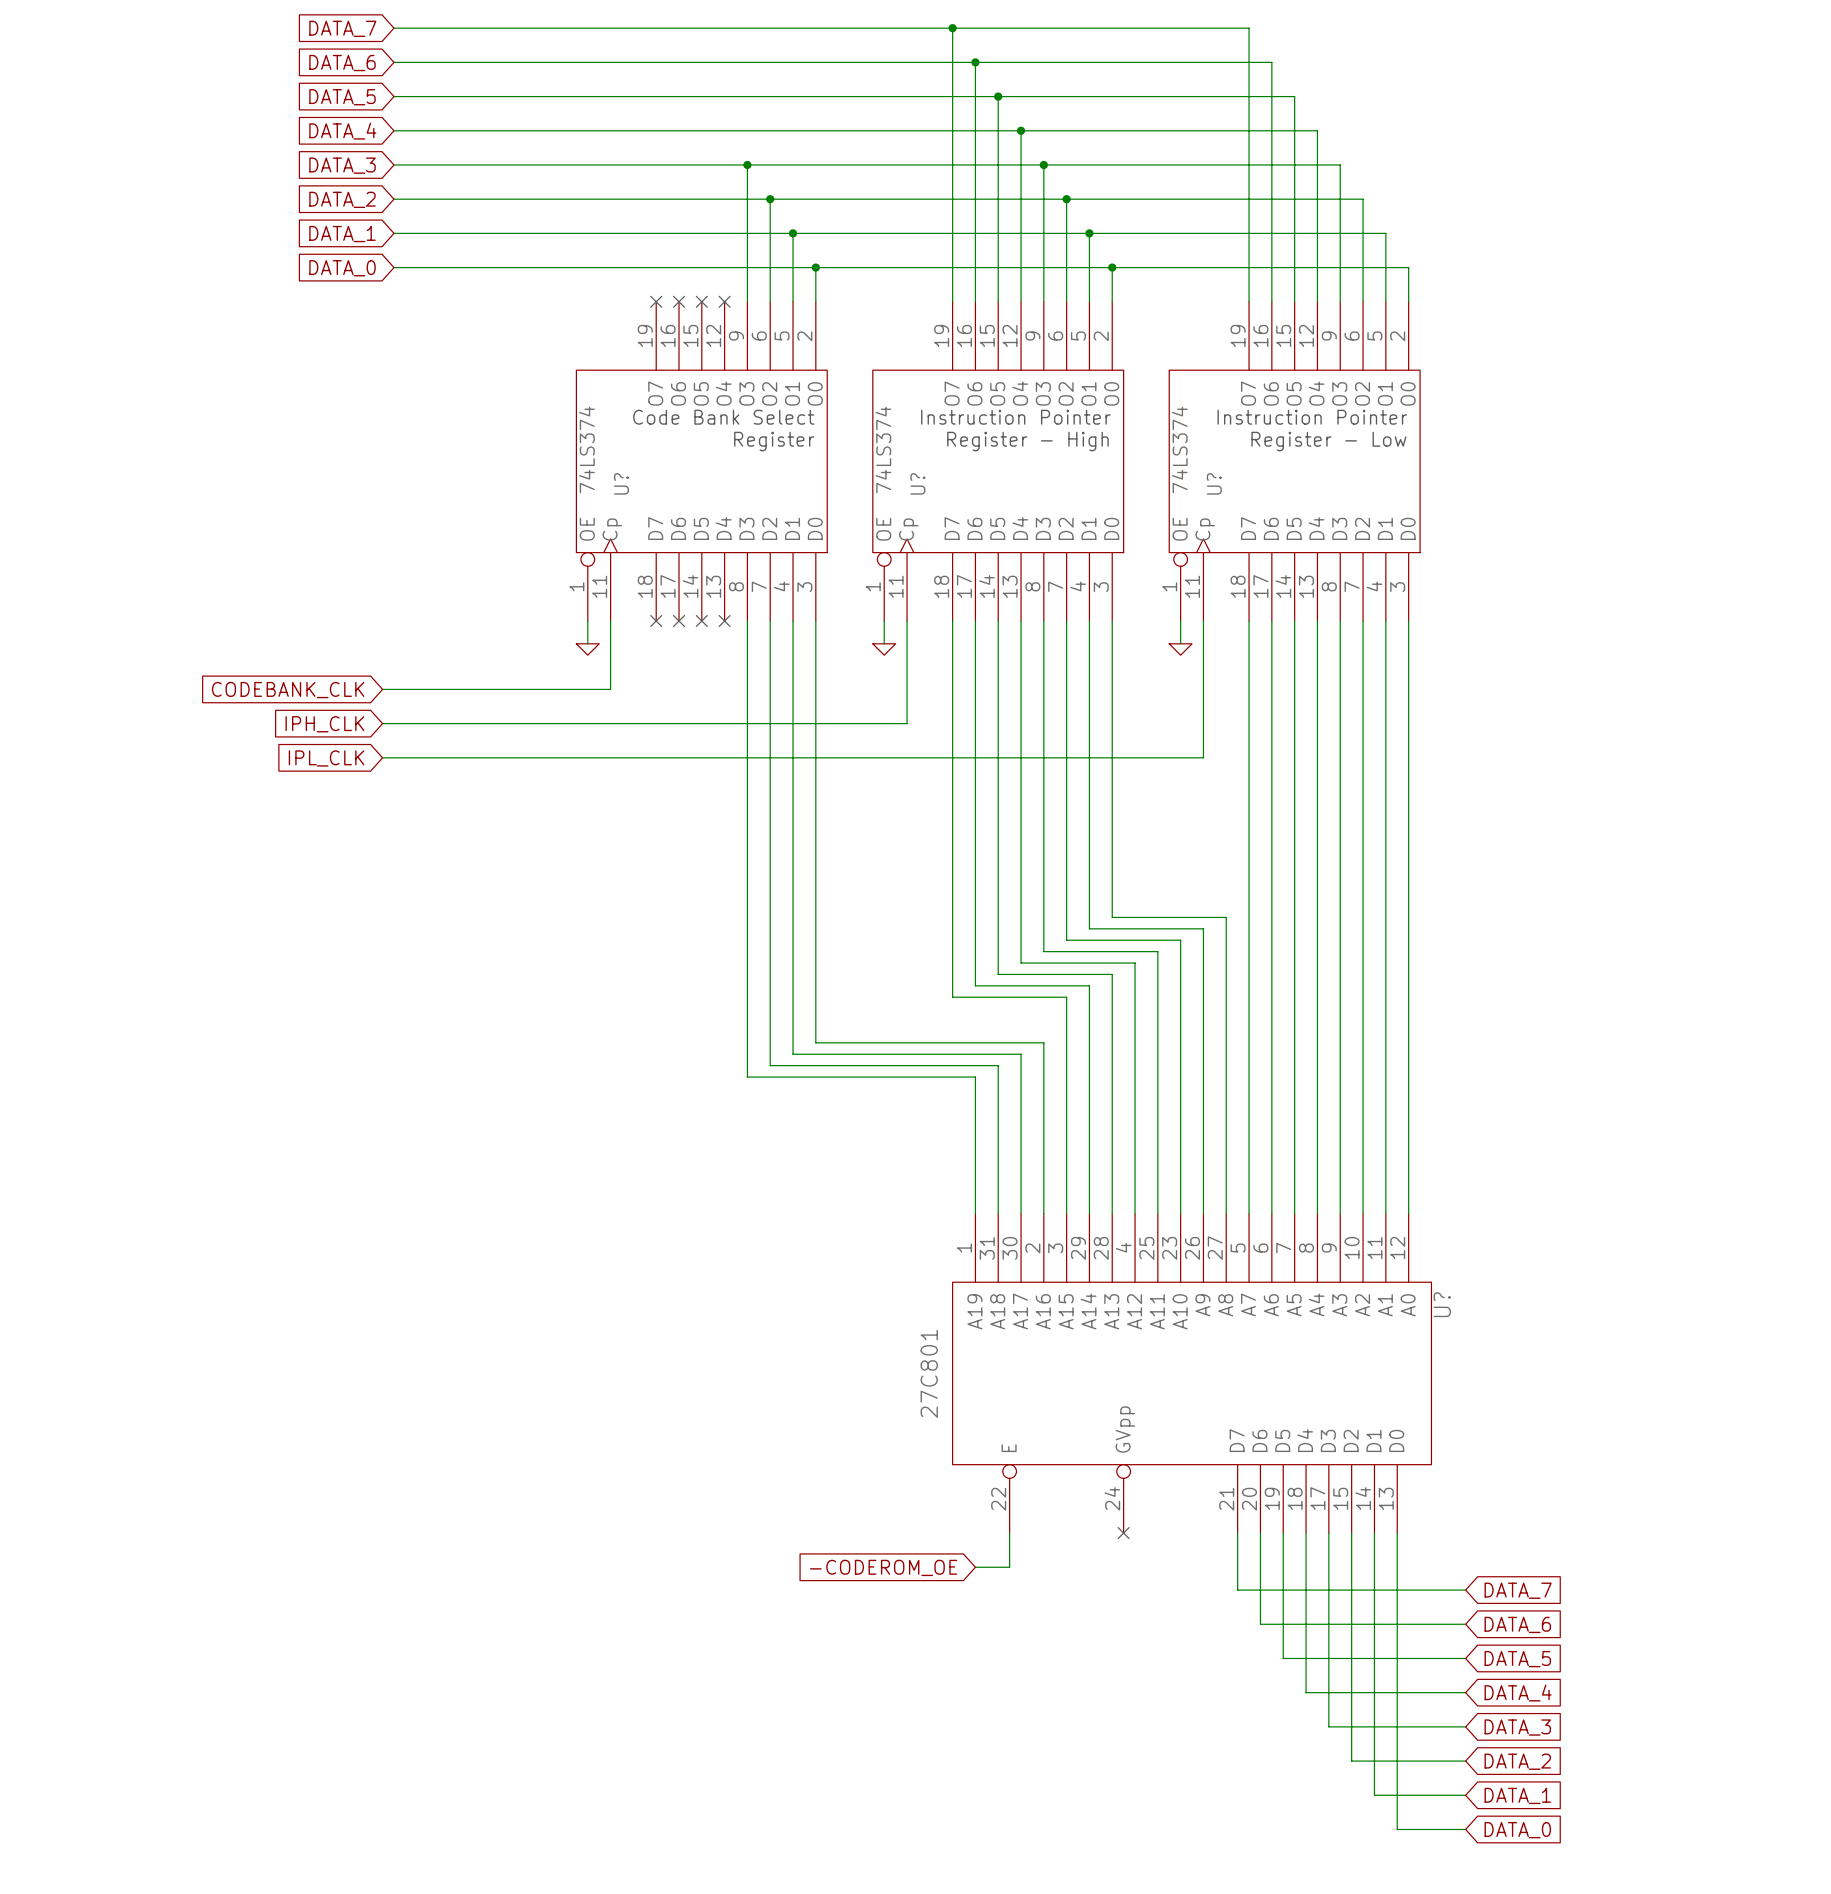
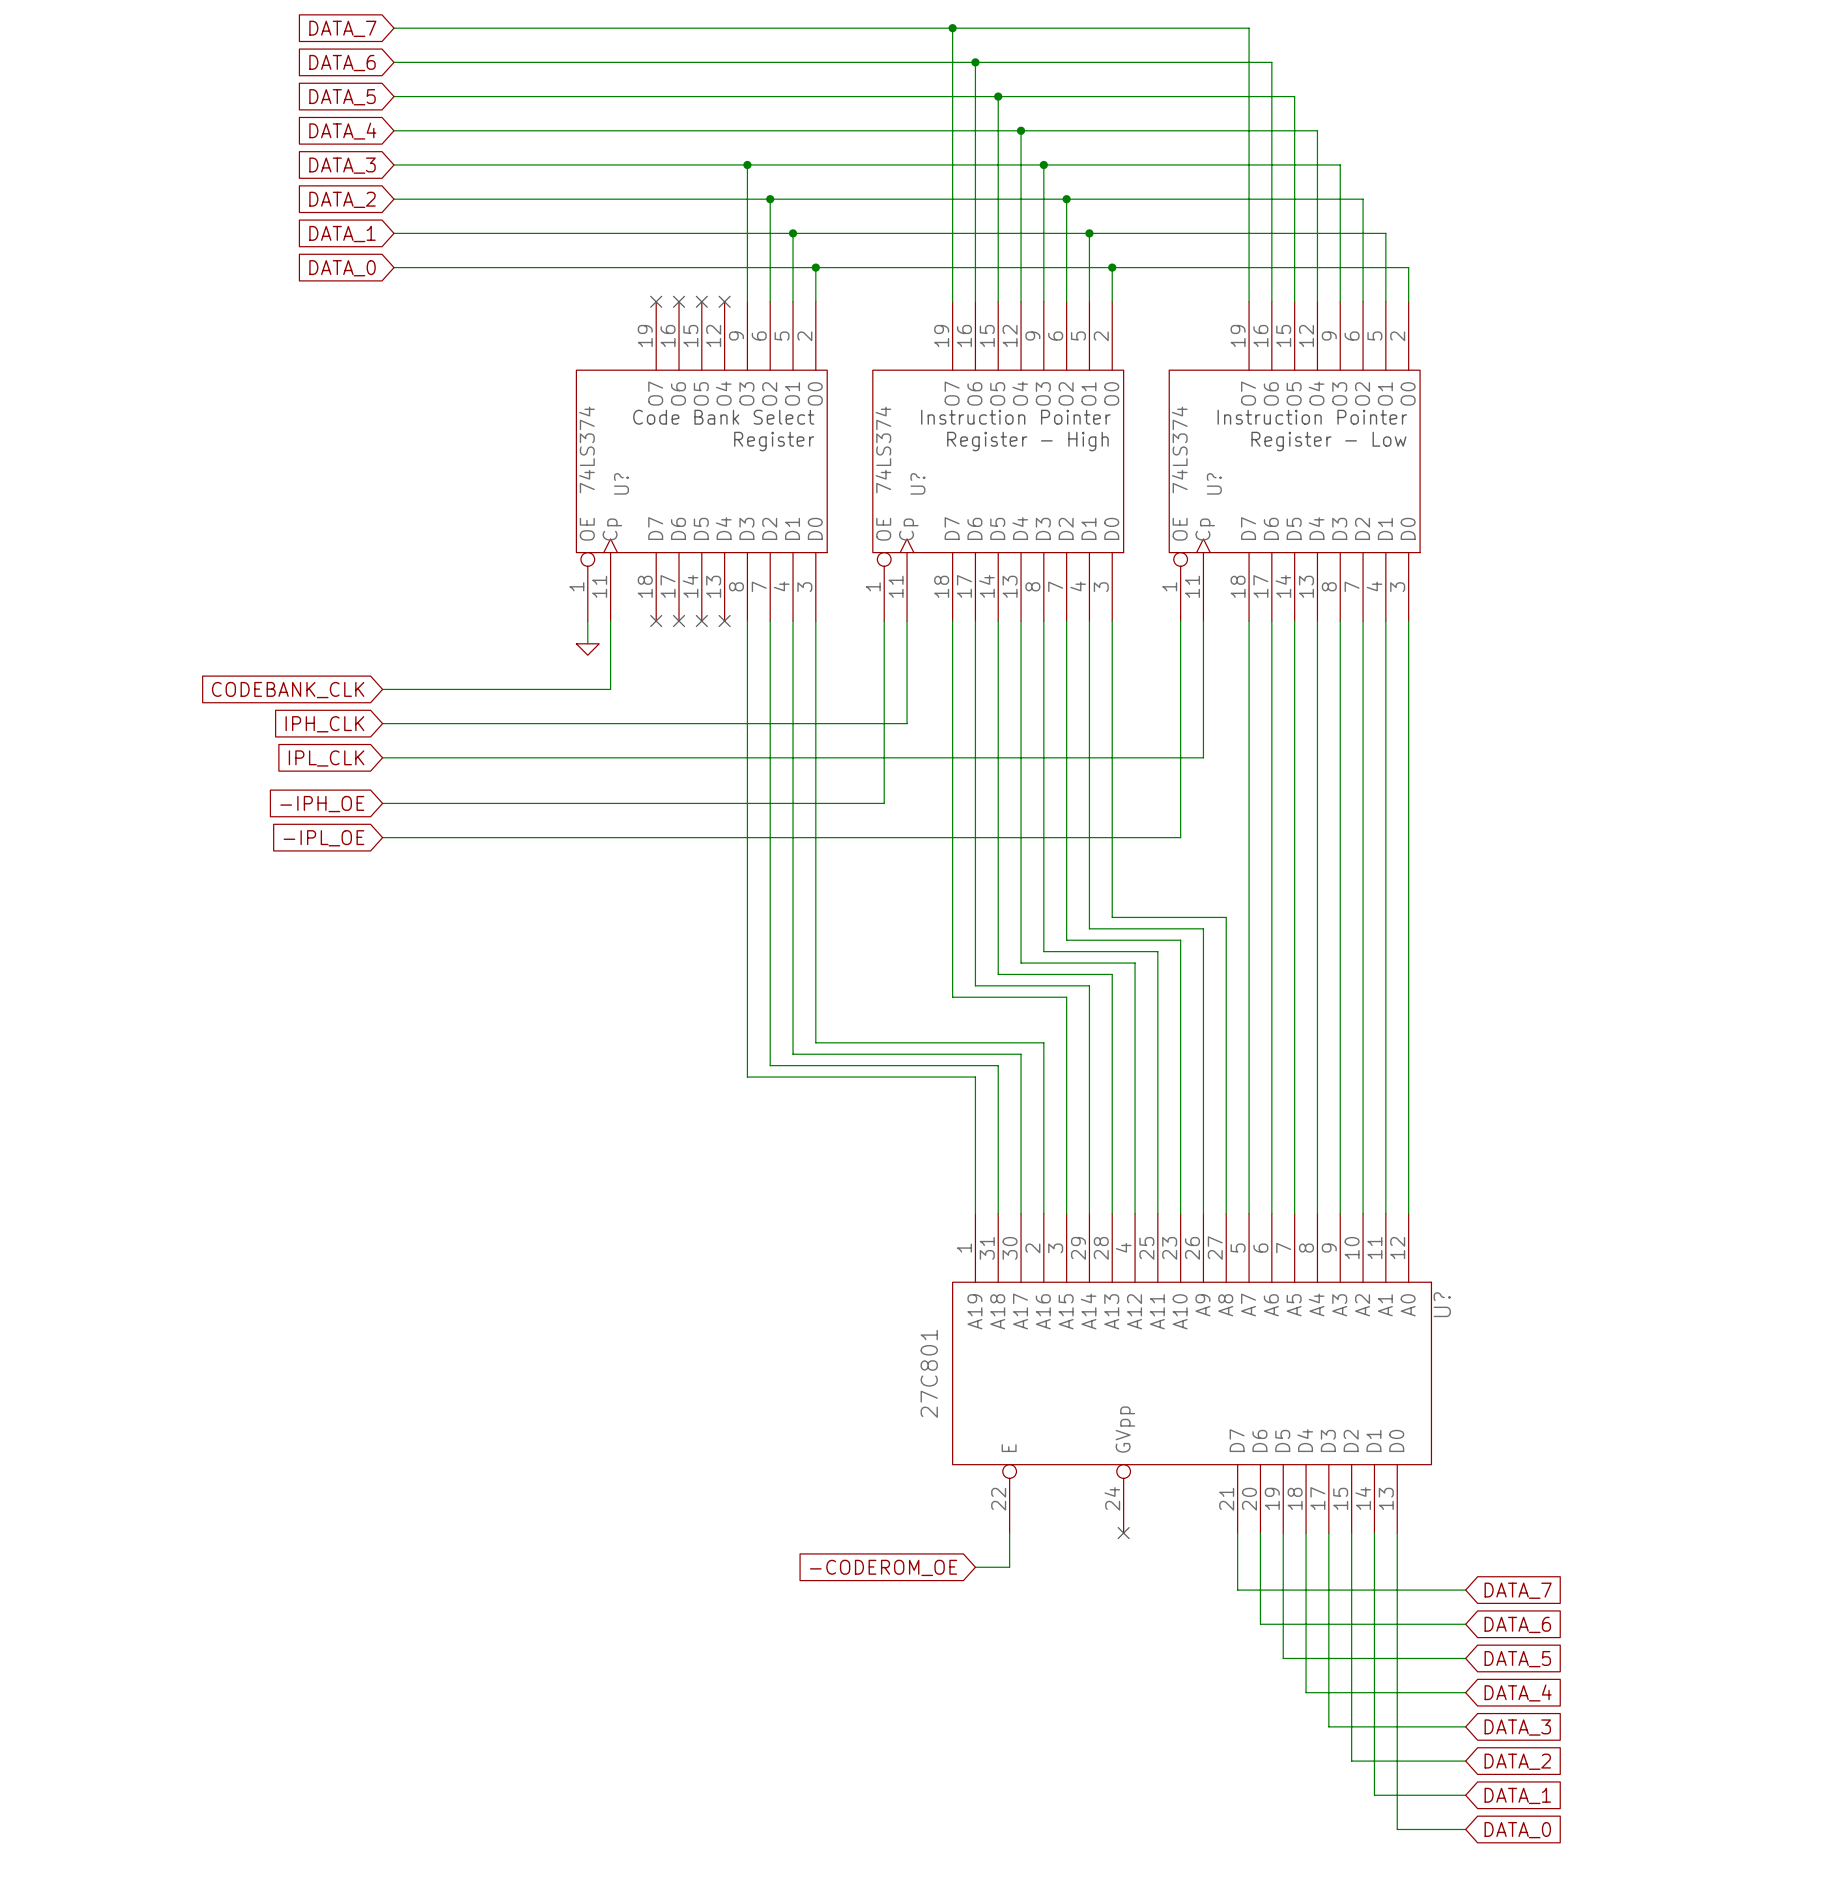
wire: none -> (884, 643) (884, 803) (382, 803)
wire: none -> (1180, 643) (1180, 837) (382, 837)
power symbol: (884, 649) -> none
power symbol: (1180, 649) -> none
global label: none -> -IPH_OE (322, 804)
global label: none -> -IPL_OE (323, 838)

